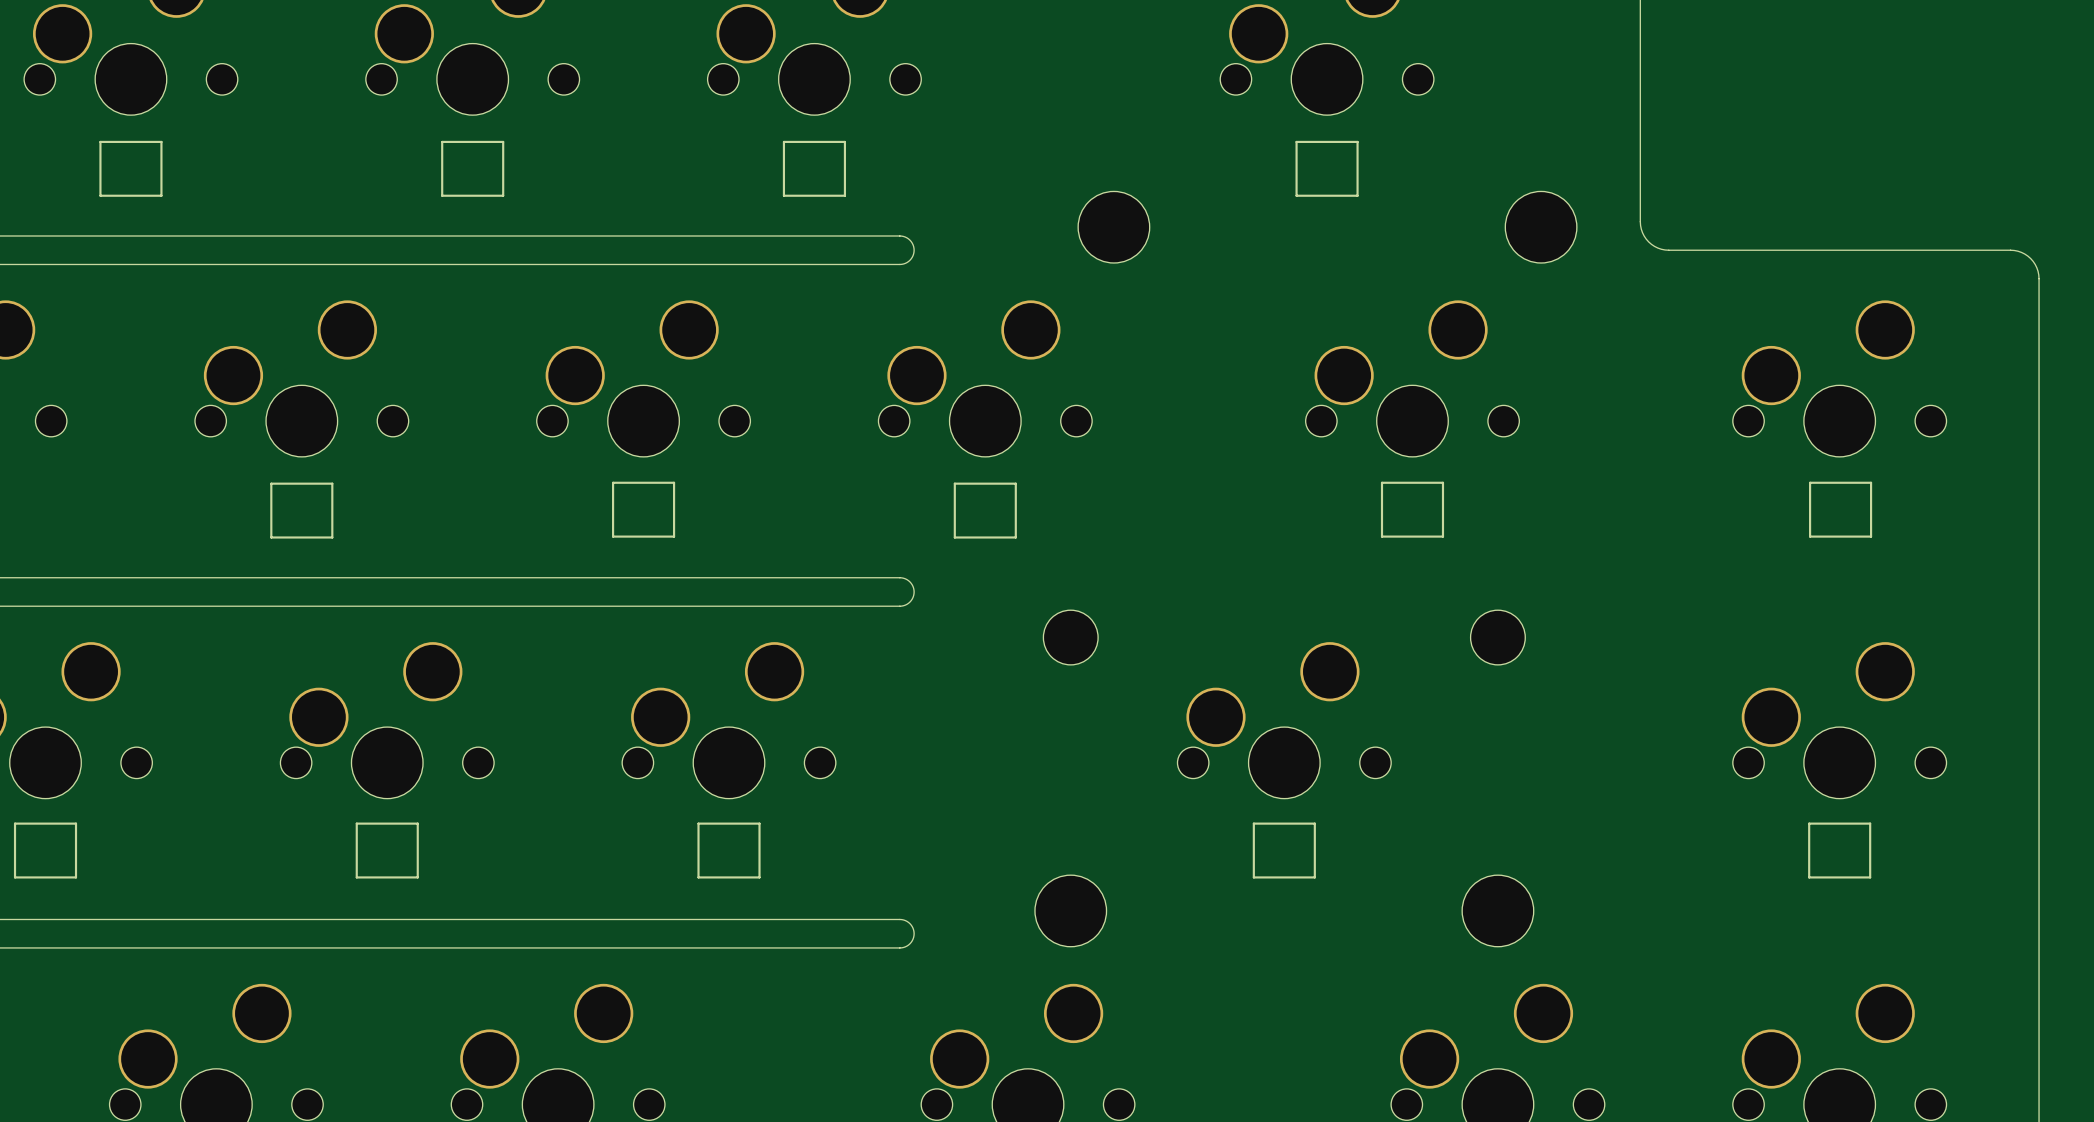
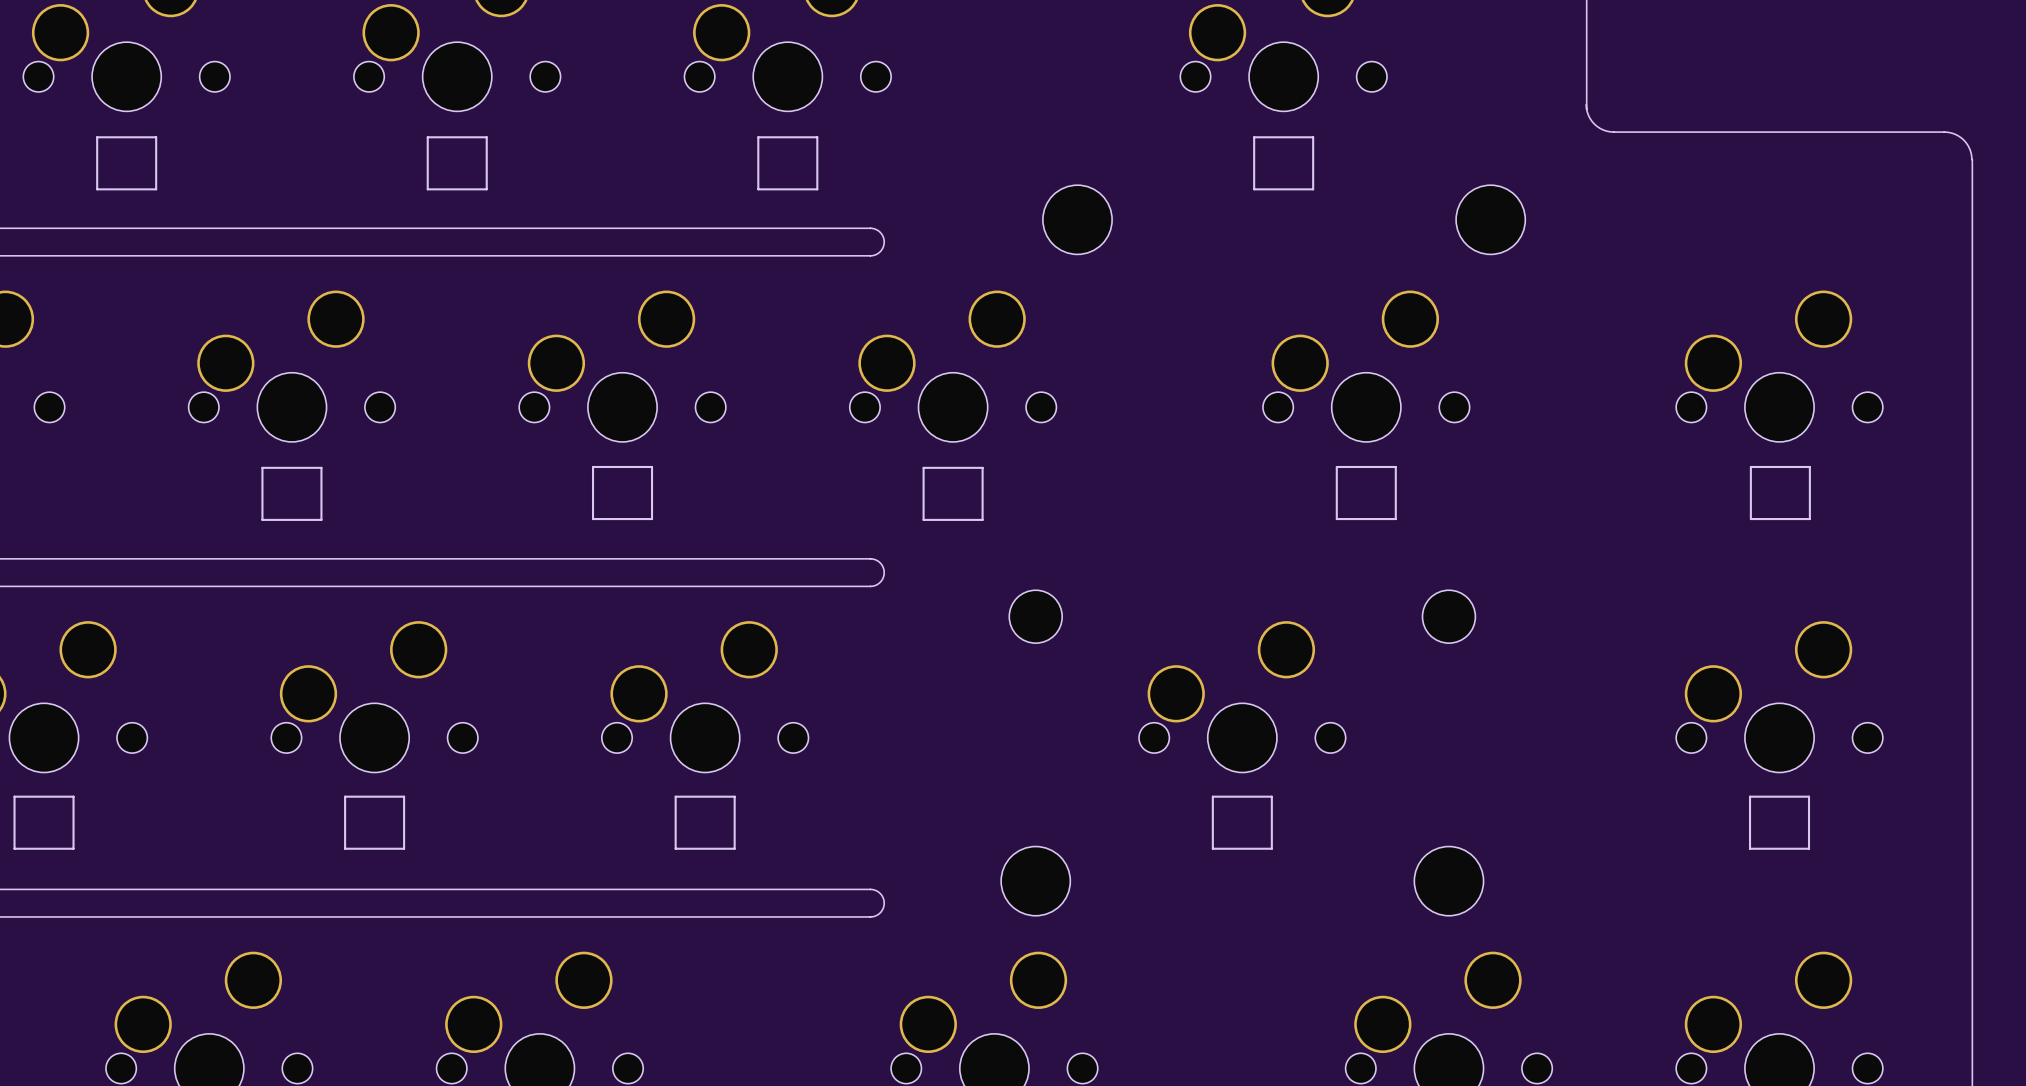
board edge: none -> (1586, 104) (1591, 121) (1600, 128) (1610, 131) (1947, 132) (1958, 135) (1966, 142) (1971, 159)
board edge: (1640, 113) (1640, 225) (1646, 239) (1657, 248) (1668, 250) (2014, 250) (2024, 254) (2033, 261) (2039, 278) -> (1972, 159) (1972, 269)

